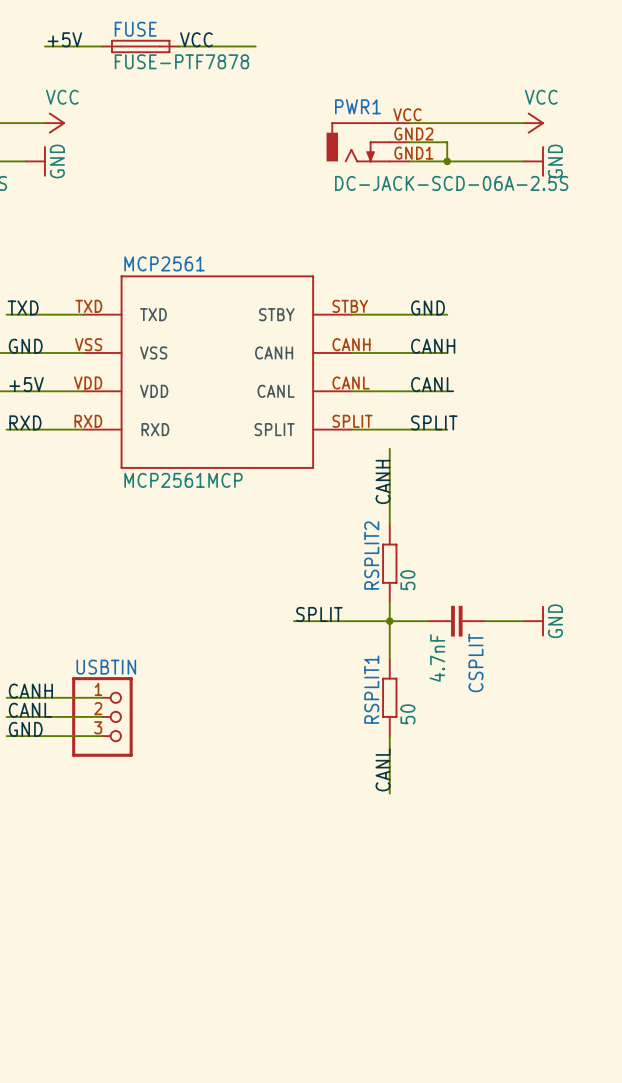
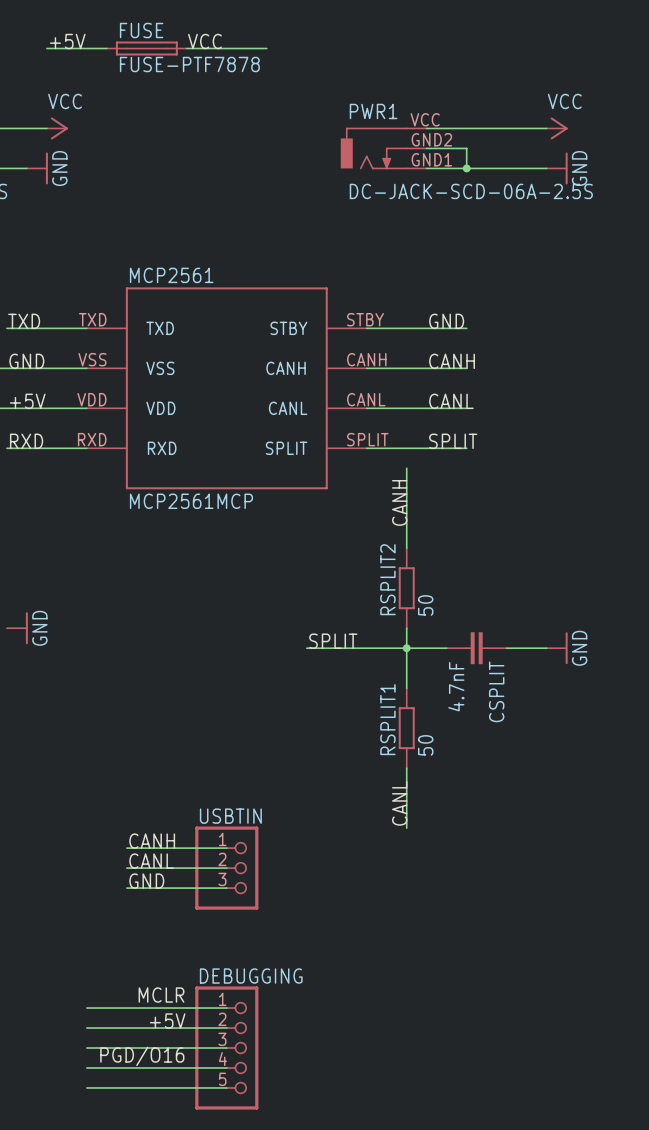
power symbol: none -> GND (17, 628)
label position: CANH (30, 691) -> CANH (152, 841)
wire: (6, 697) (102, 697) -> (126, 848) (226, 848)
label position: CANL (30, 710) -> CANL (151, 861)
wire: (6, 716) (102, 716) -> (126, 868) (226, 868)
USBTIN position: (102, 716) -> (226, 868)
label position: GND (25, 729) -> GND (146, 881)
wire: (6, 736) (102, 736) -> (126, 888) (226, 888)
label: none -> MCLR (161, 995)
wire: none -> (86, 1008) (226, 1008)
label: none -> +5V (167, 1021)
wire: none -> (86, 1028) (226, 1028)
wire: none -> (86, 1048) (226, 1048)
DEBUGGING: none -> (226, 1048)
label: none -> PGD/O16 (142, 1056)
wire: none -> (86, 1067) (226, 1067)
wire: none -> (86, 1087) (226, 1087)

